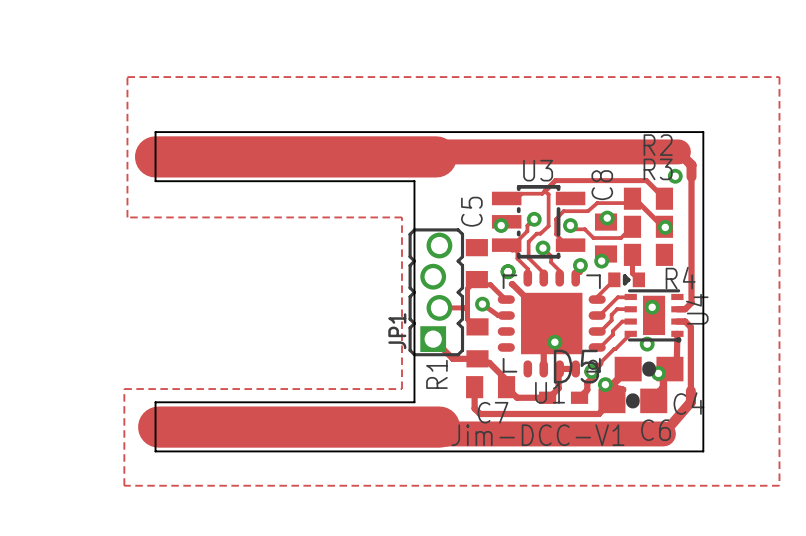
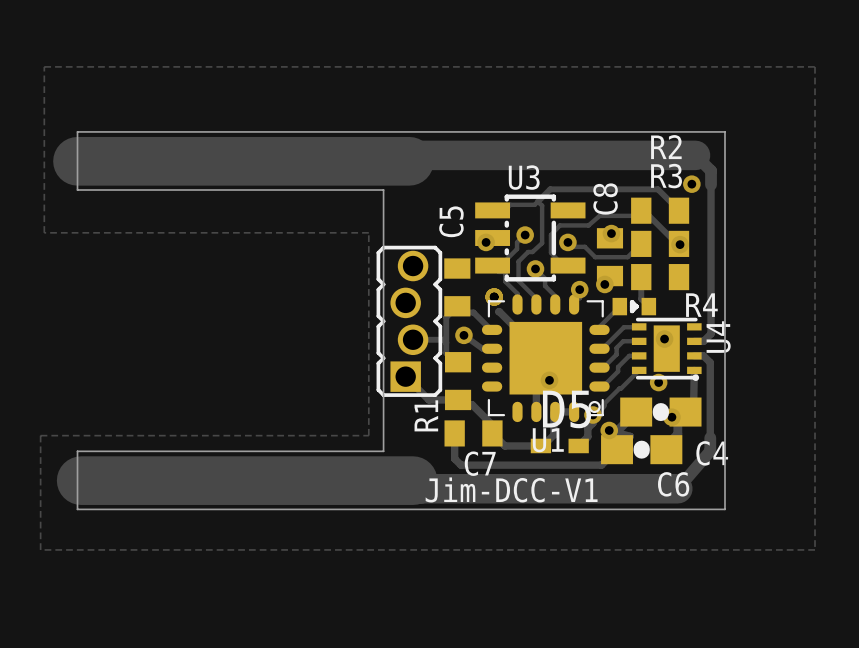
JP1 name: JP1 (397, 331) -> none
R1 name position: R1 (436, 374) -> R1 (426, 415)

